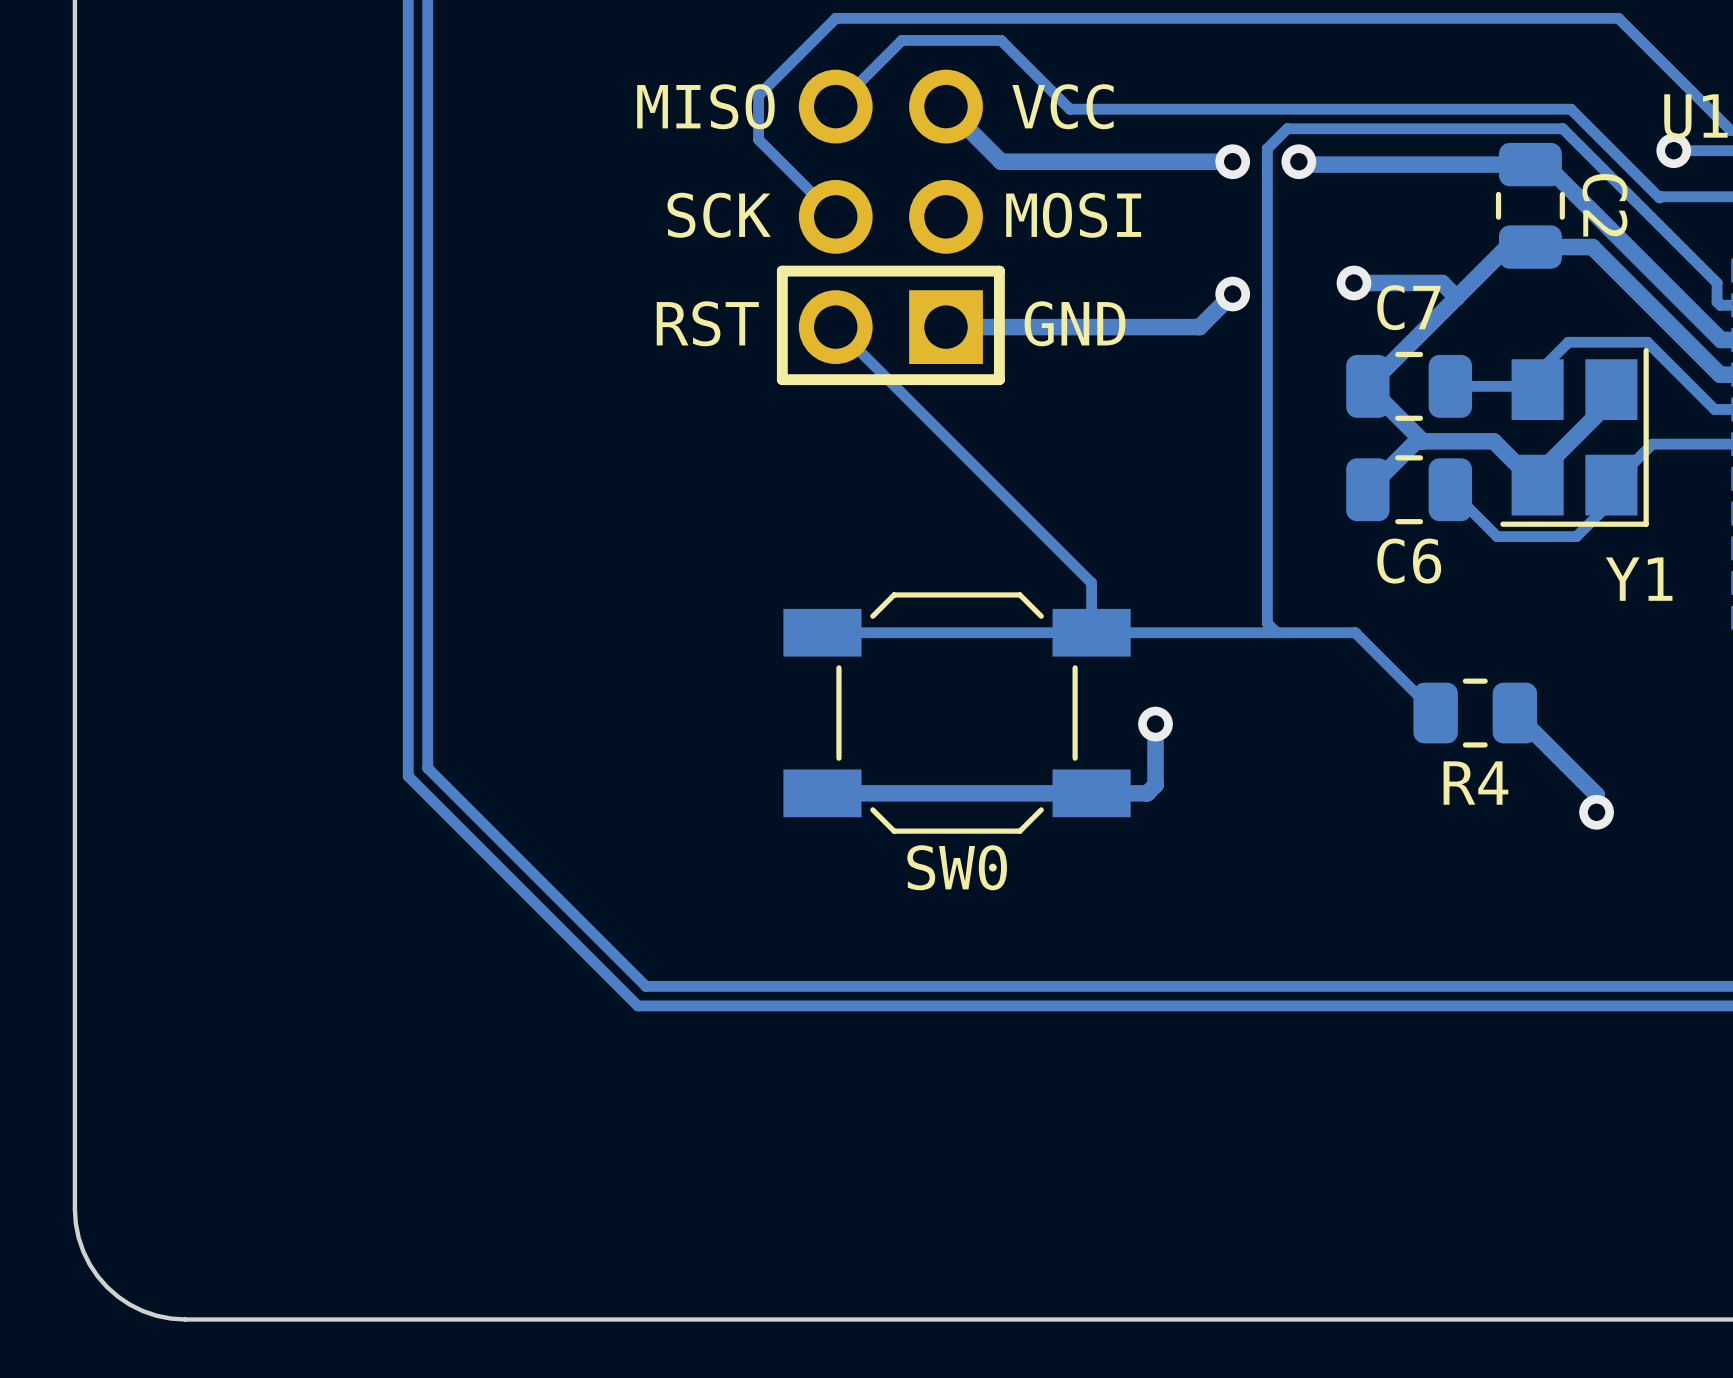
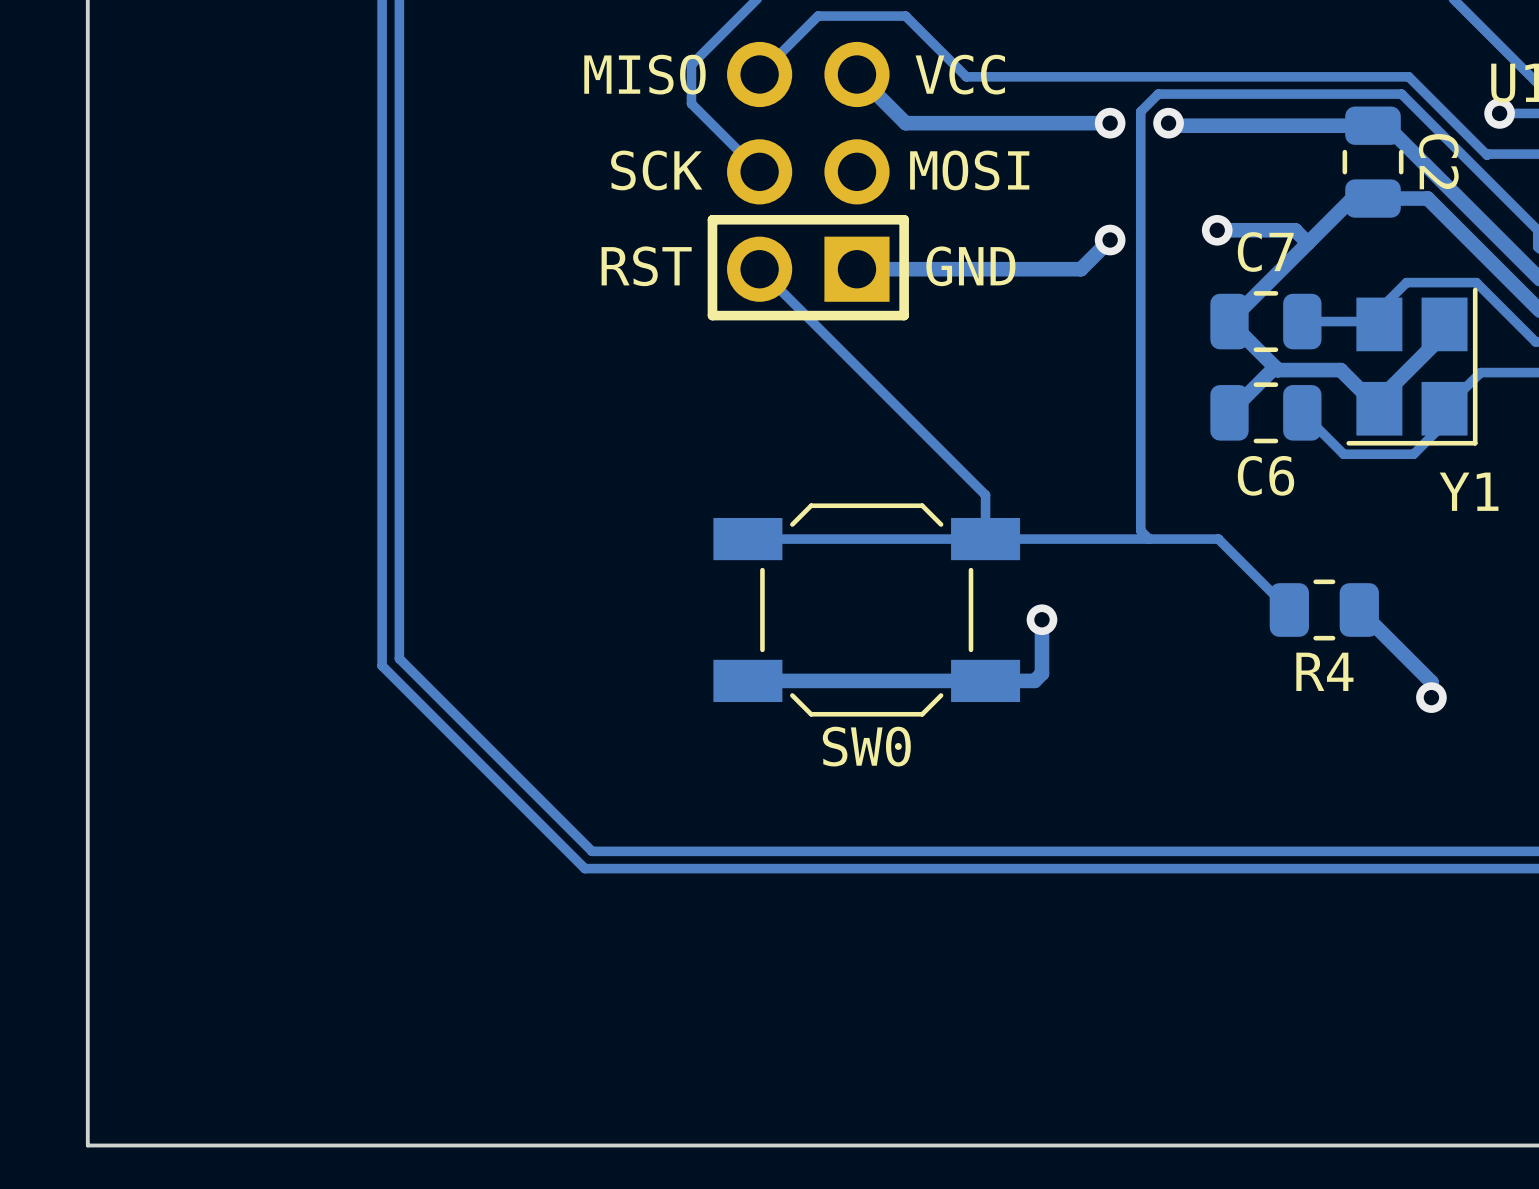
board edge: (74, 1209) (78, 1237) (83, 1251) (97, 1276) (107, 1287) (118, 1296) (142, 1311) (156, 1315) (185, 1319) -> (87, 1048) (87, 1145) (185, 1145)

